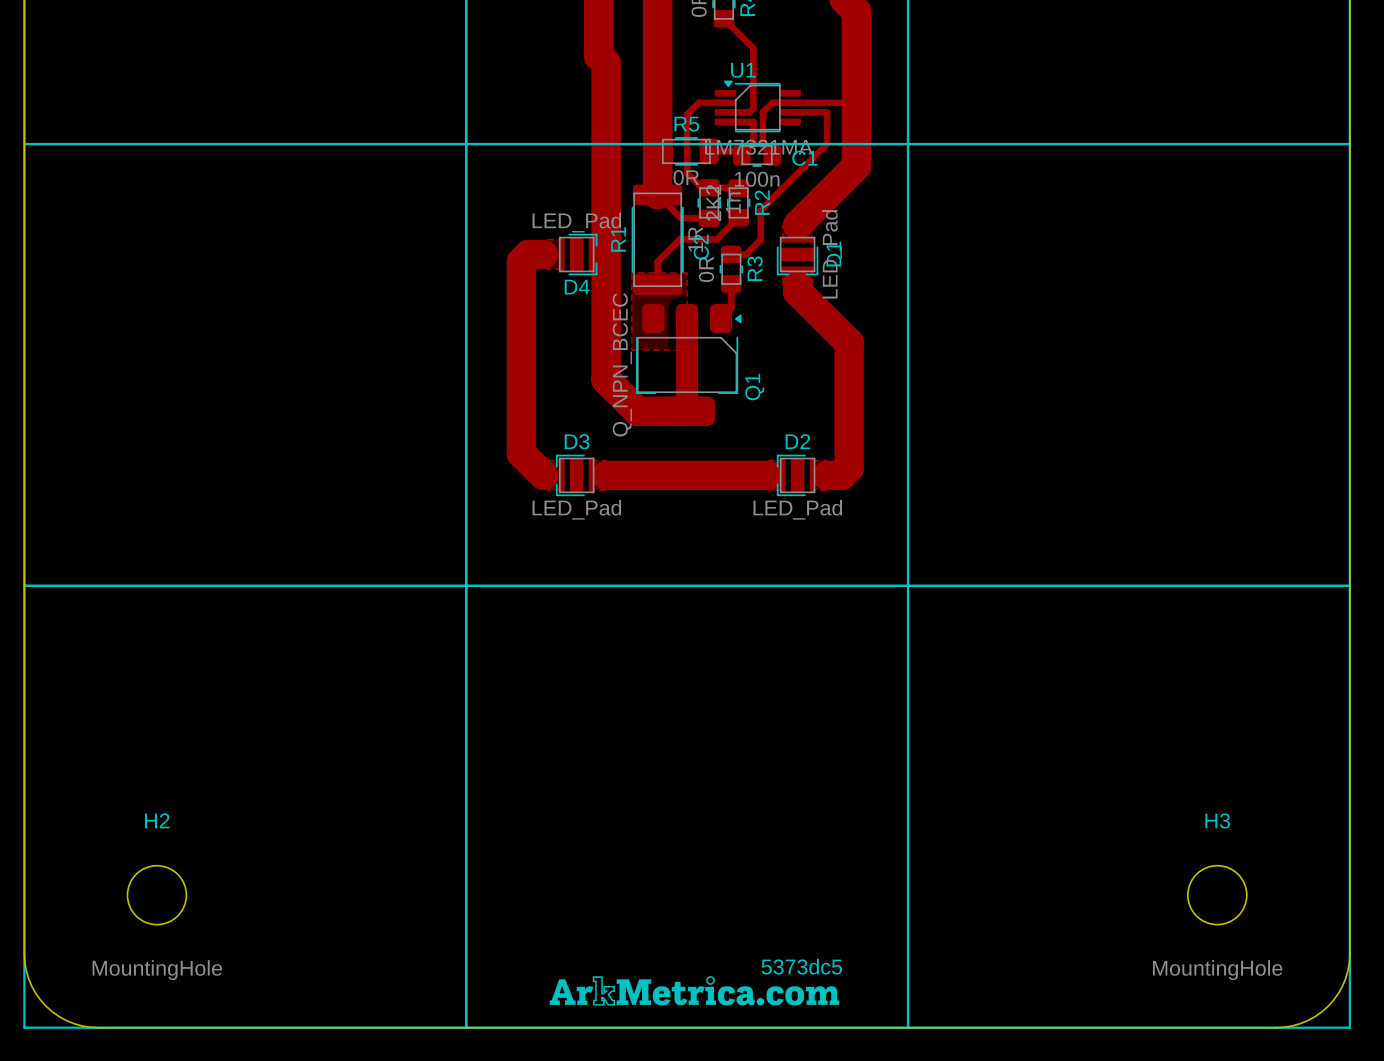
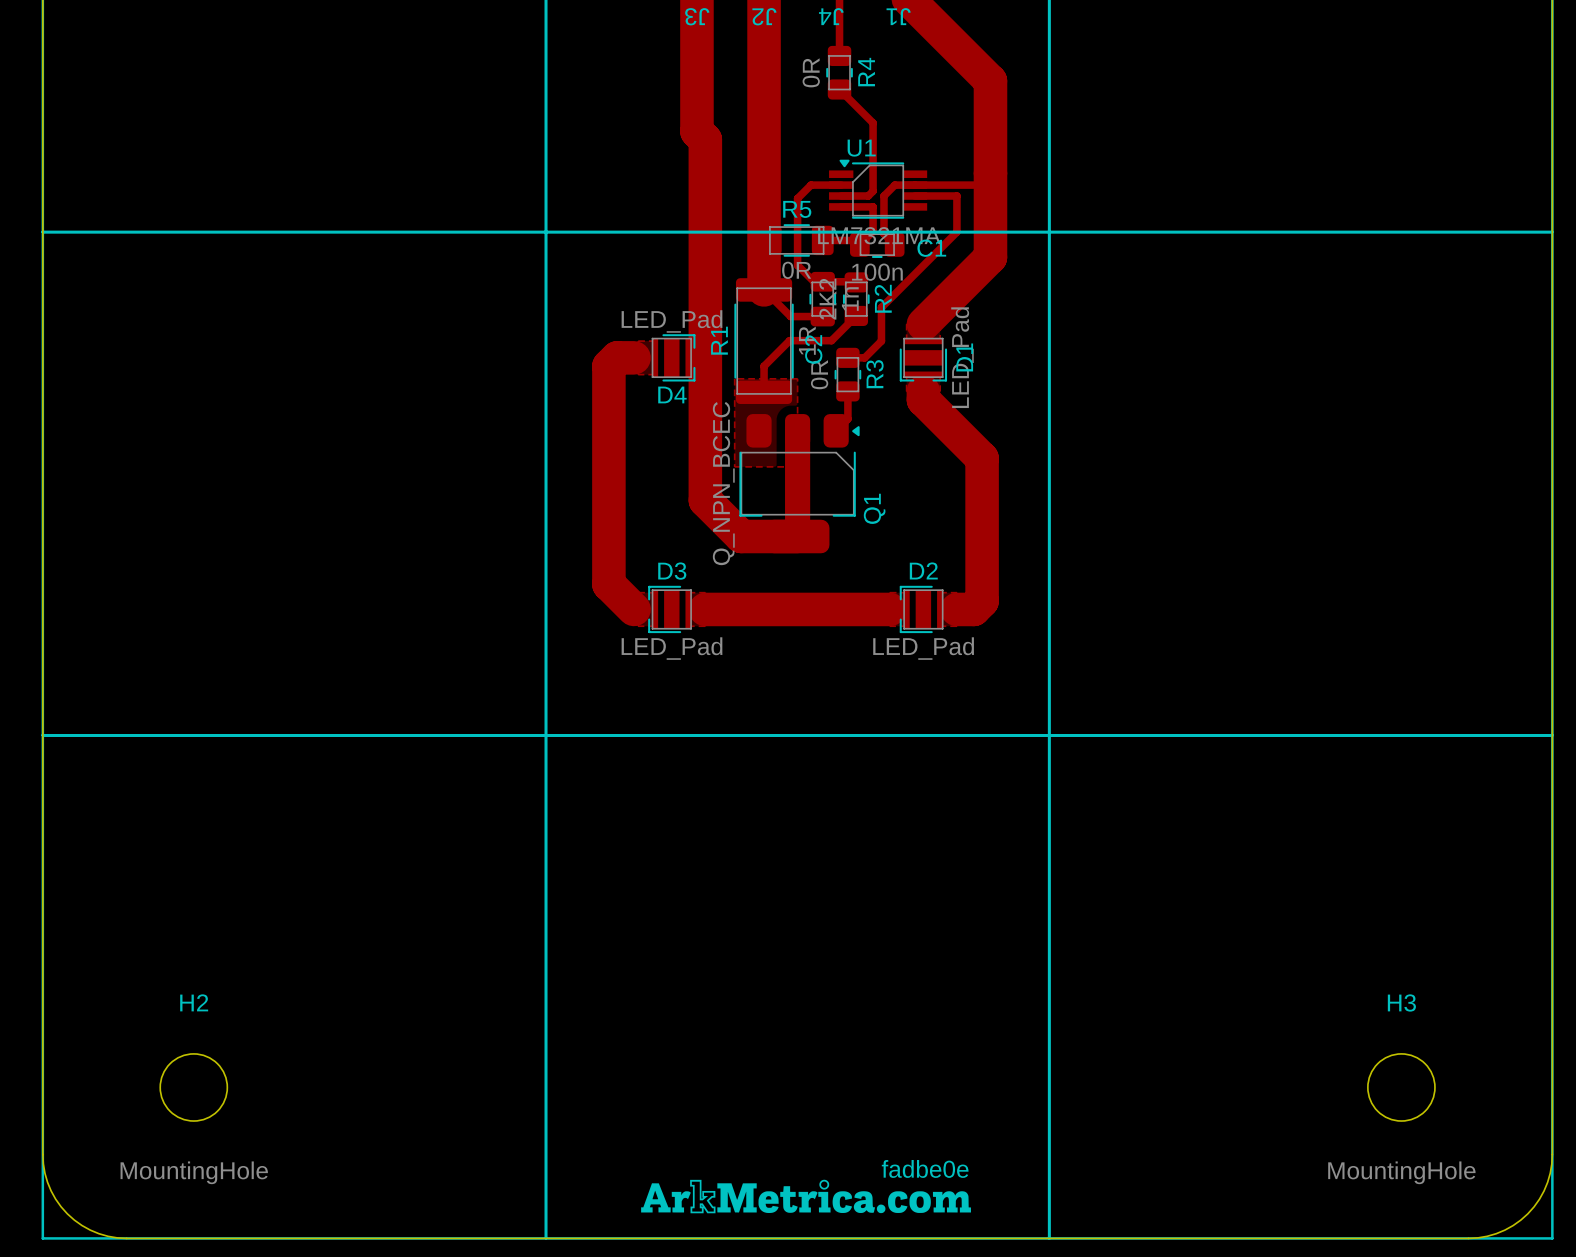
text: 5373dc5 (801, 966) -> fadbe0e (925, 1168)

